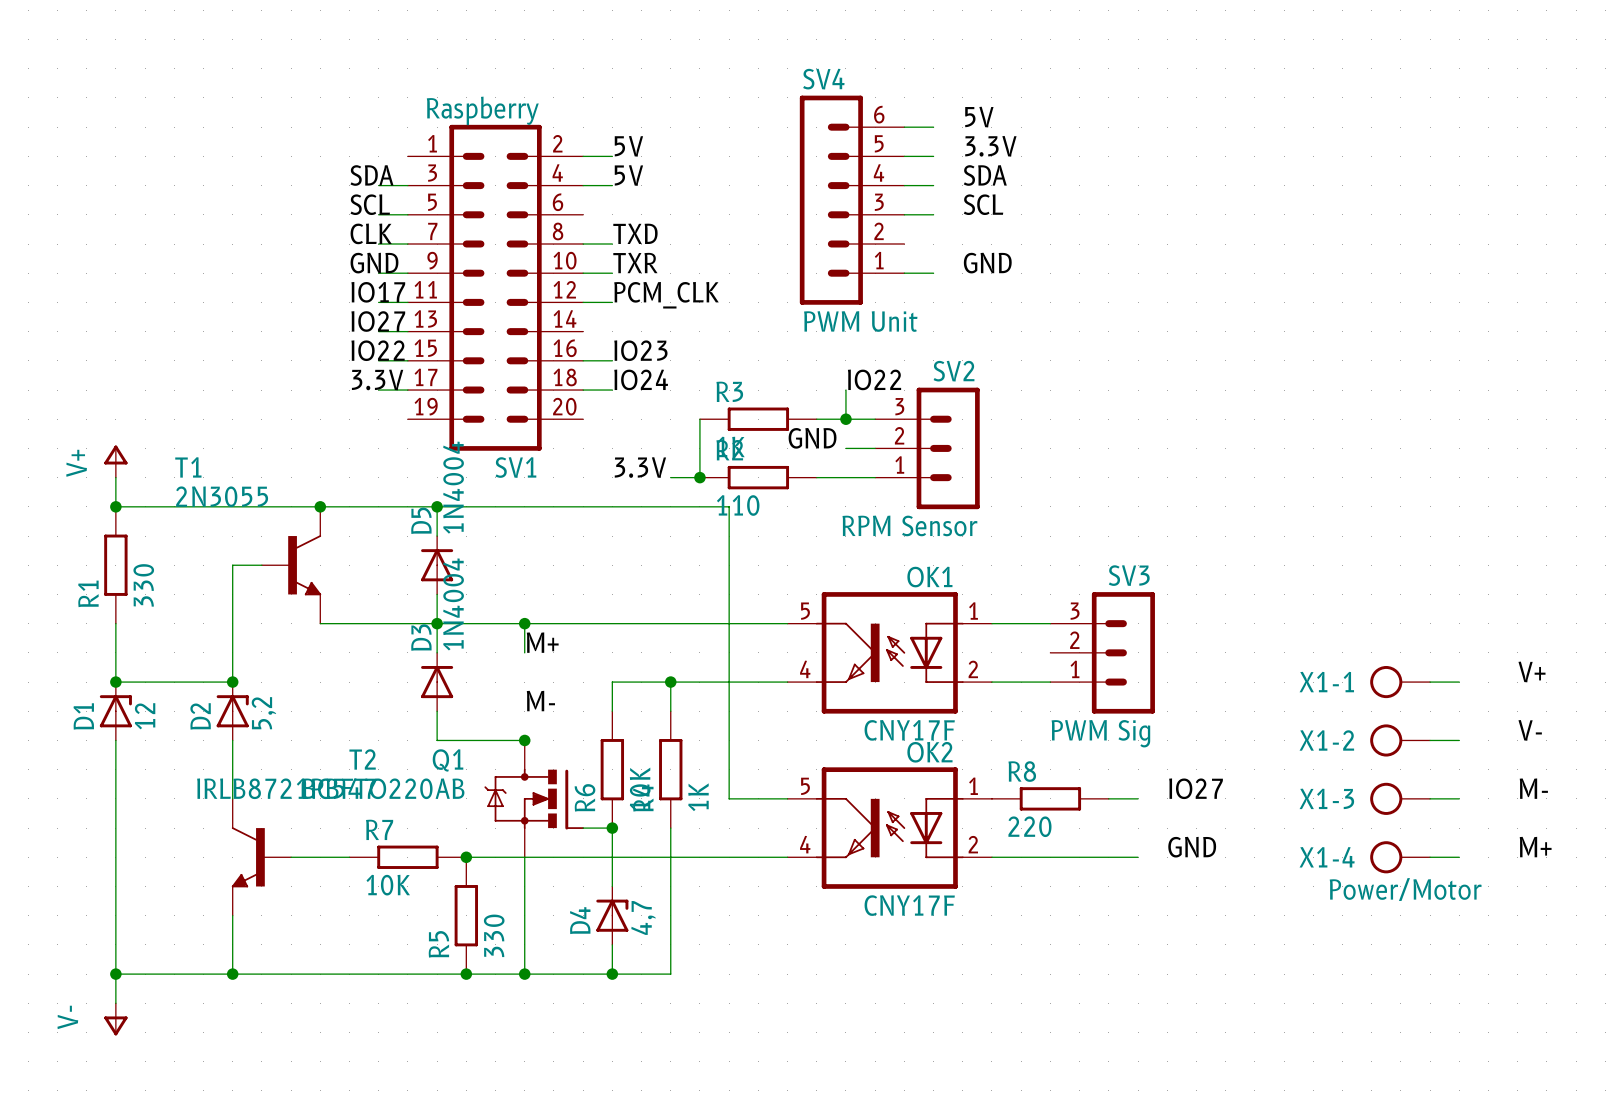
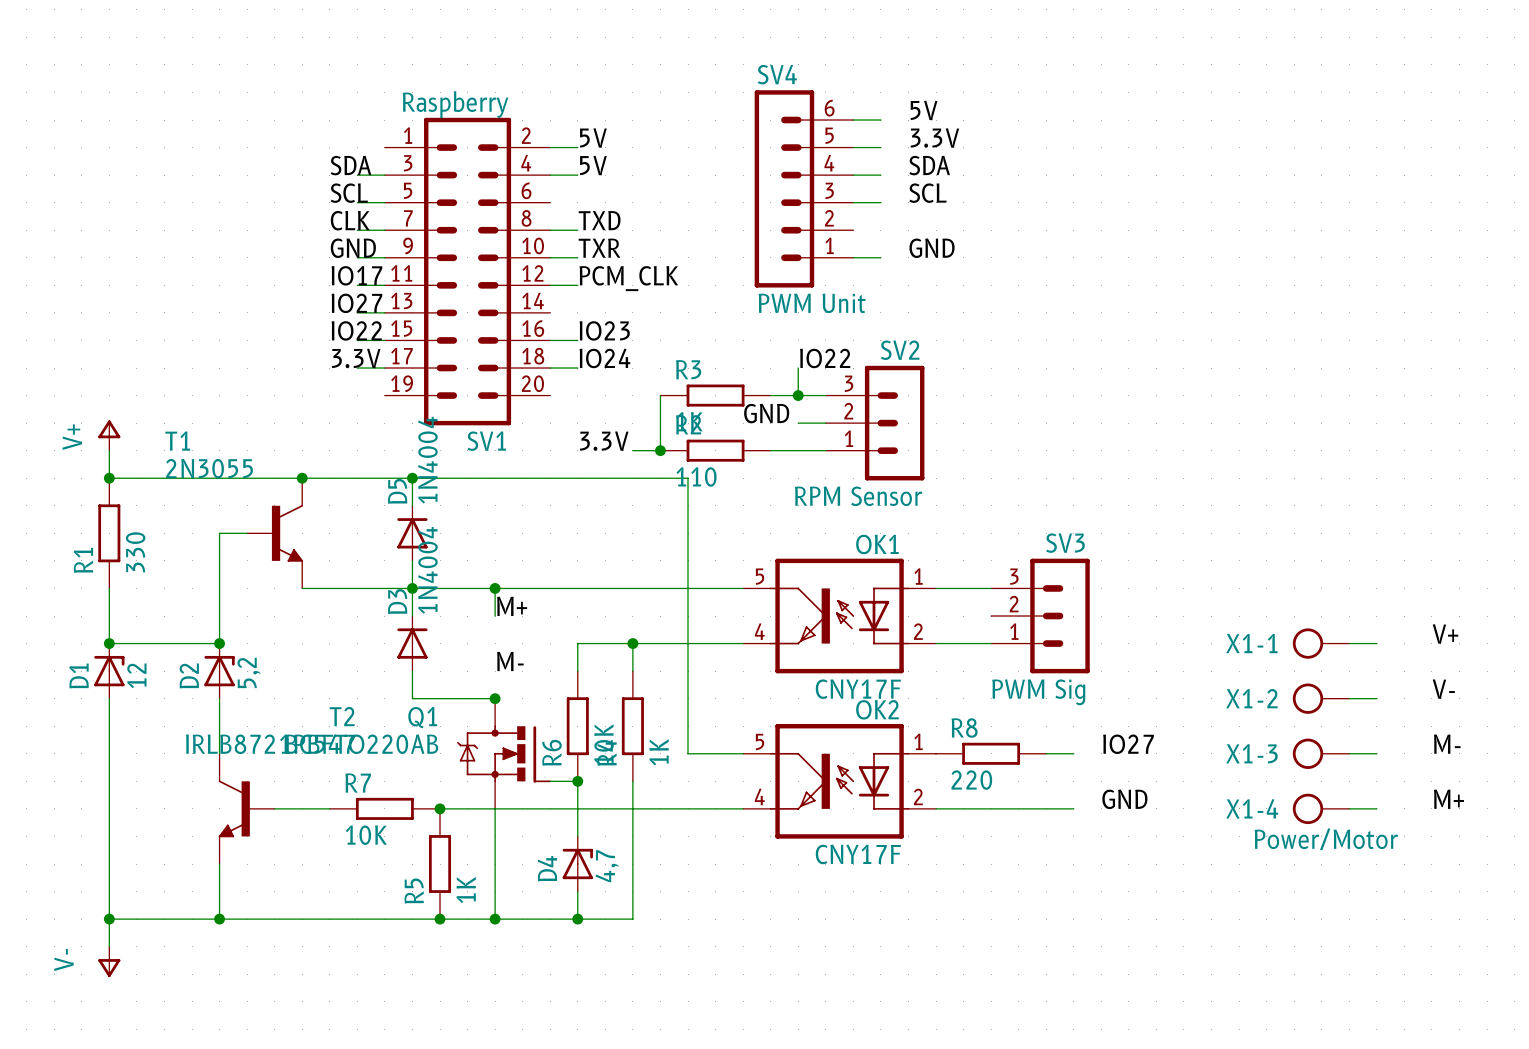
R5 value: 330 (494, 935) -> 1K (466, 889)

